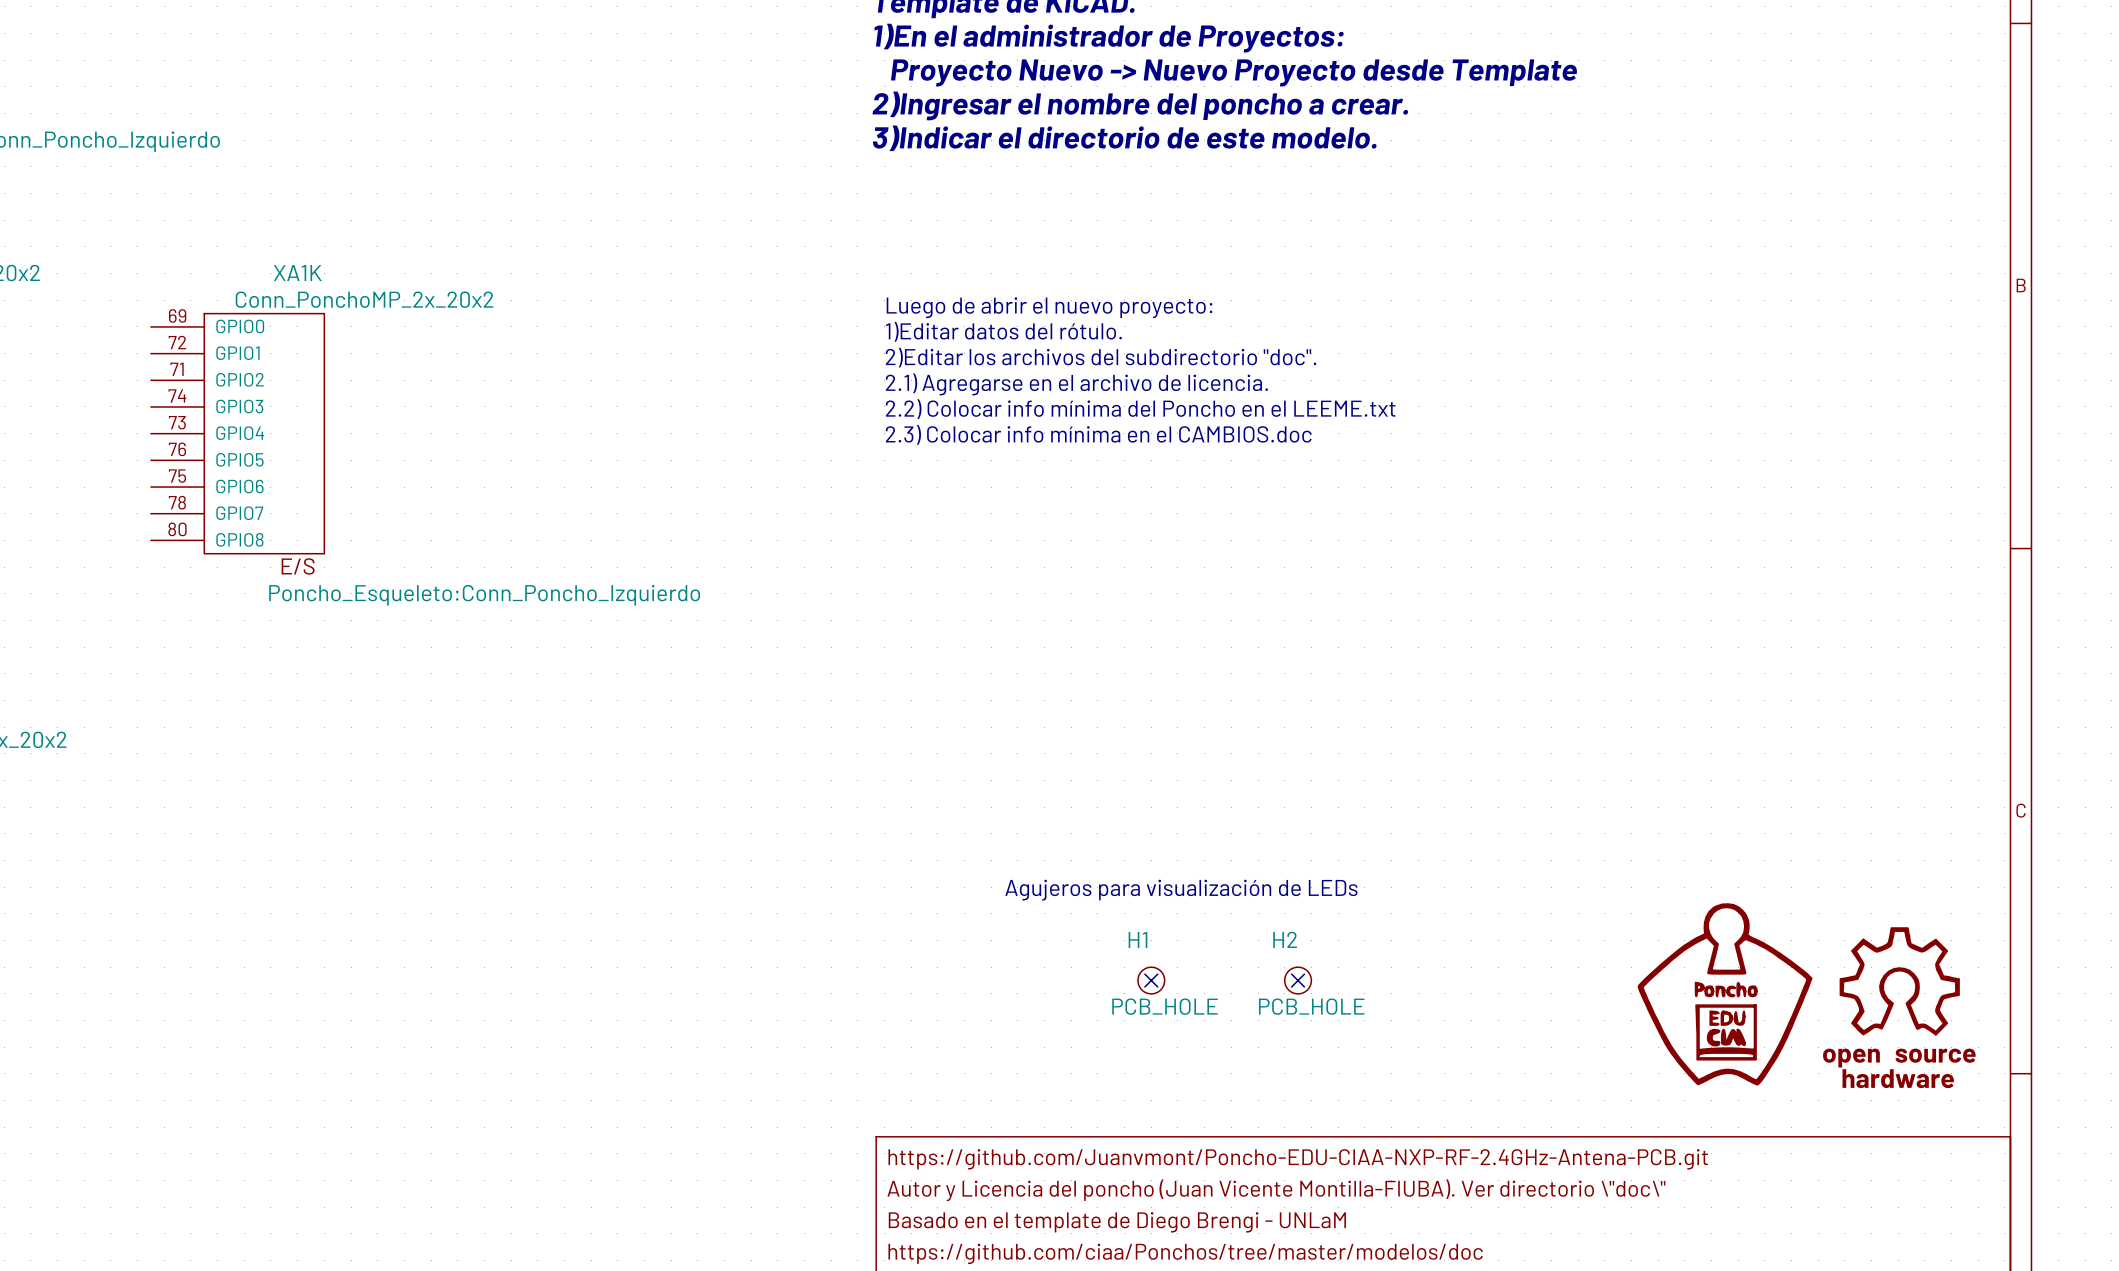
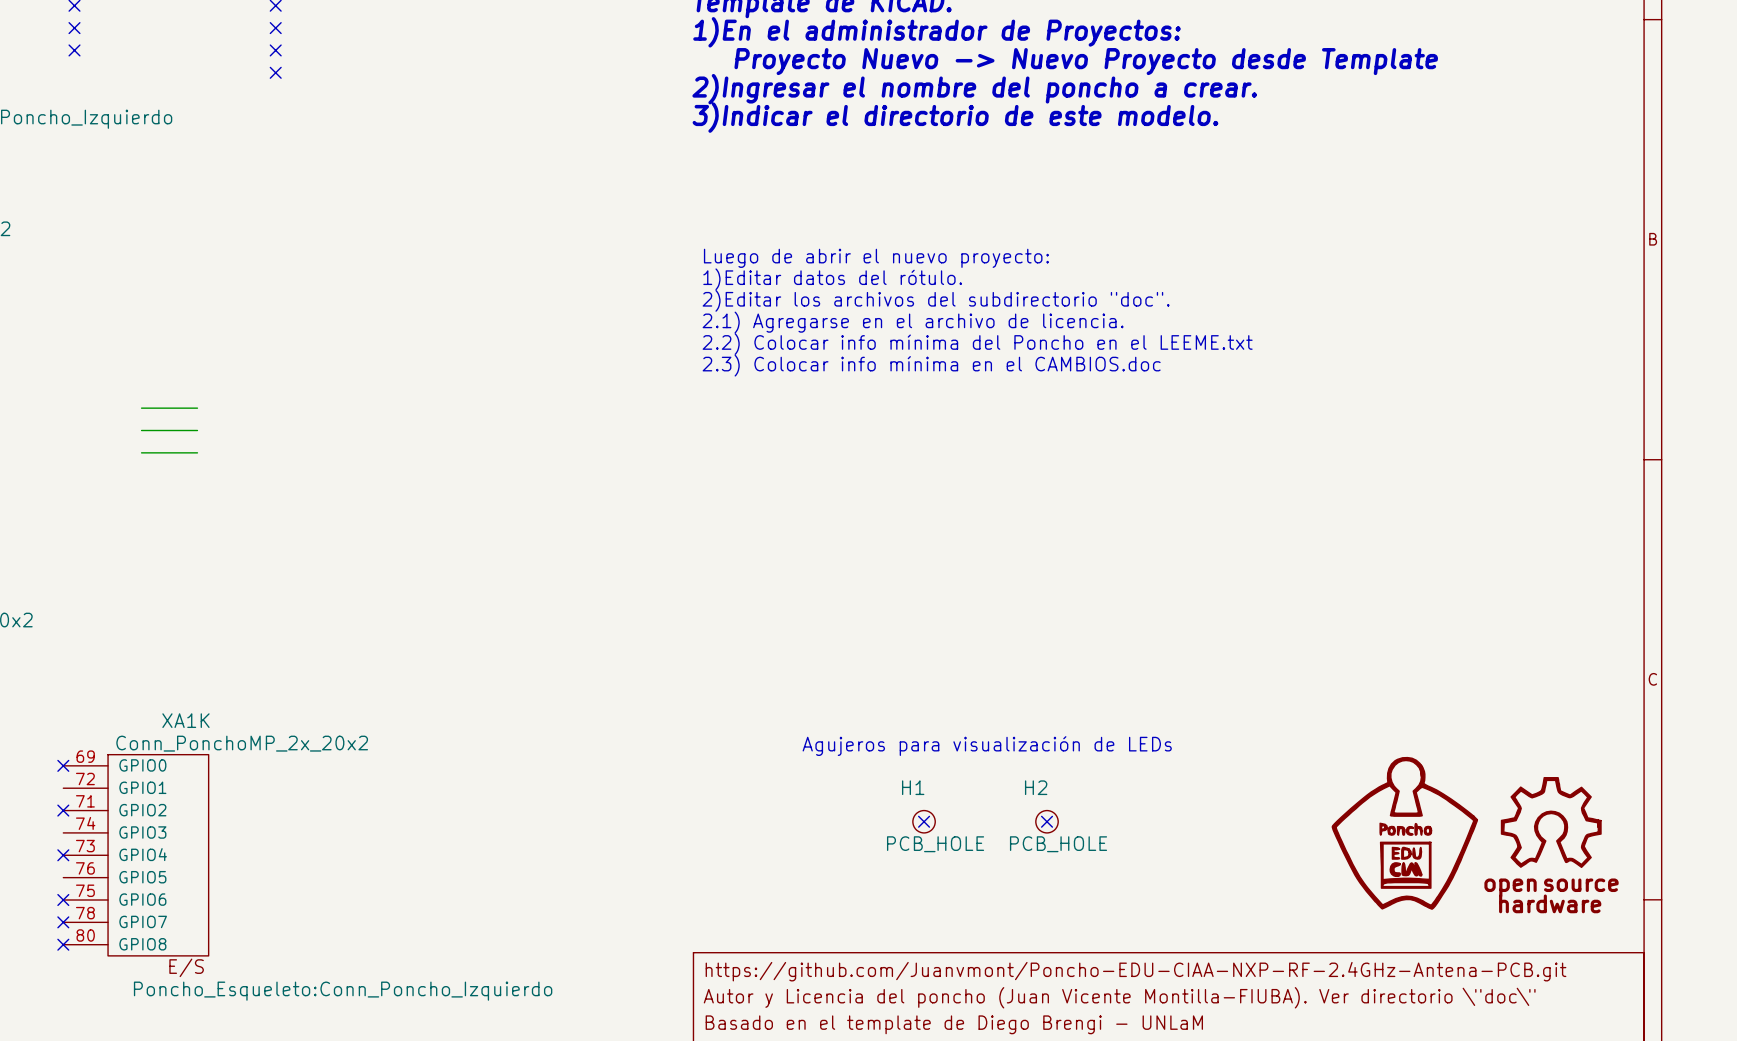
no-connect mark: none -> (74, 5)
no-connect mark: none -> (275, 5)
no-connect mark: none -> (74, 28)
no-connect mark: none -> (275, 28)
no-connect mark: none -> (74, 50)
no-connect mark: none -> (275, 50)
no-connect mark: none -> (275, 72)
XA1K position: (237, 433) -> (135, 855)
wire: none -> (141, 408) (197, 408)
wire: none -> (141, 430) (197, 430)
wire: none -> (141, 452) (197, 452)
no-connect mark: none -> (63, 765)
no-connect mark: none -> (63, 810)
no-connect mark: none -> (63, 855)
no-connect mark: none -> (63, 899)
no-connect mark: none -> (63, 922)
no-connect mark: none -> (63, 944)

